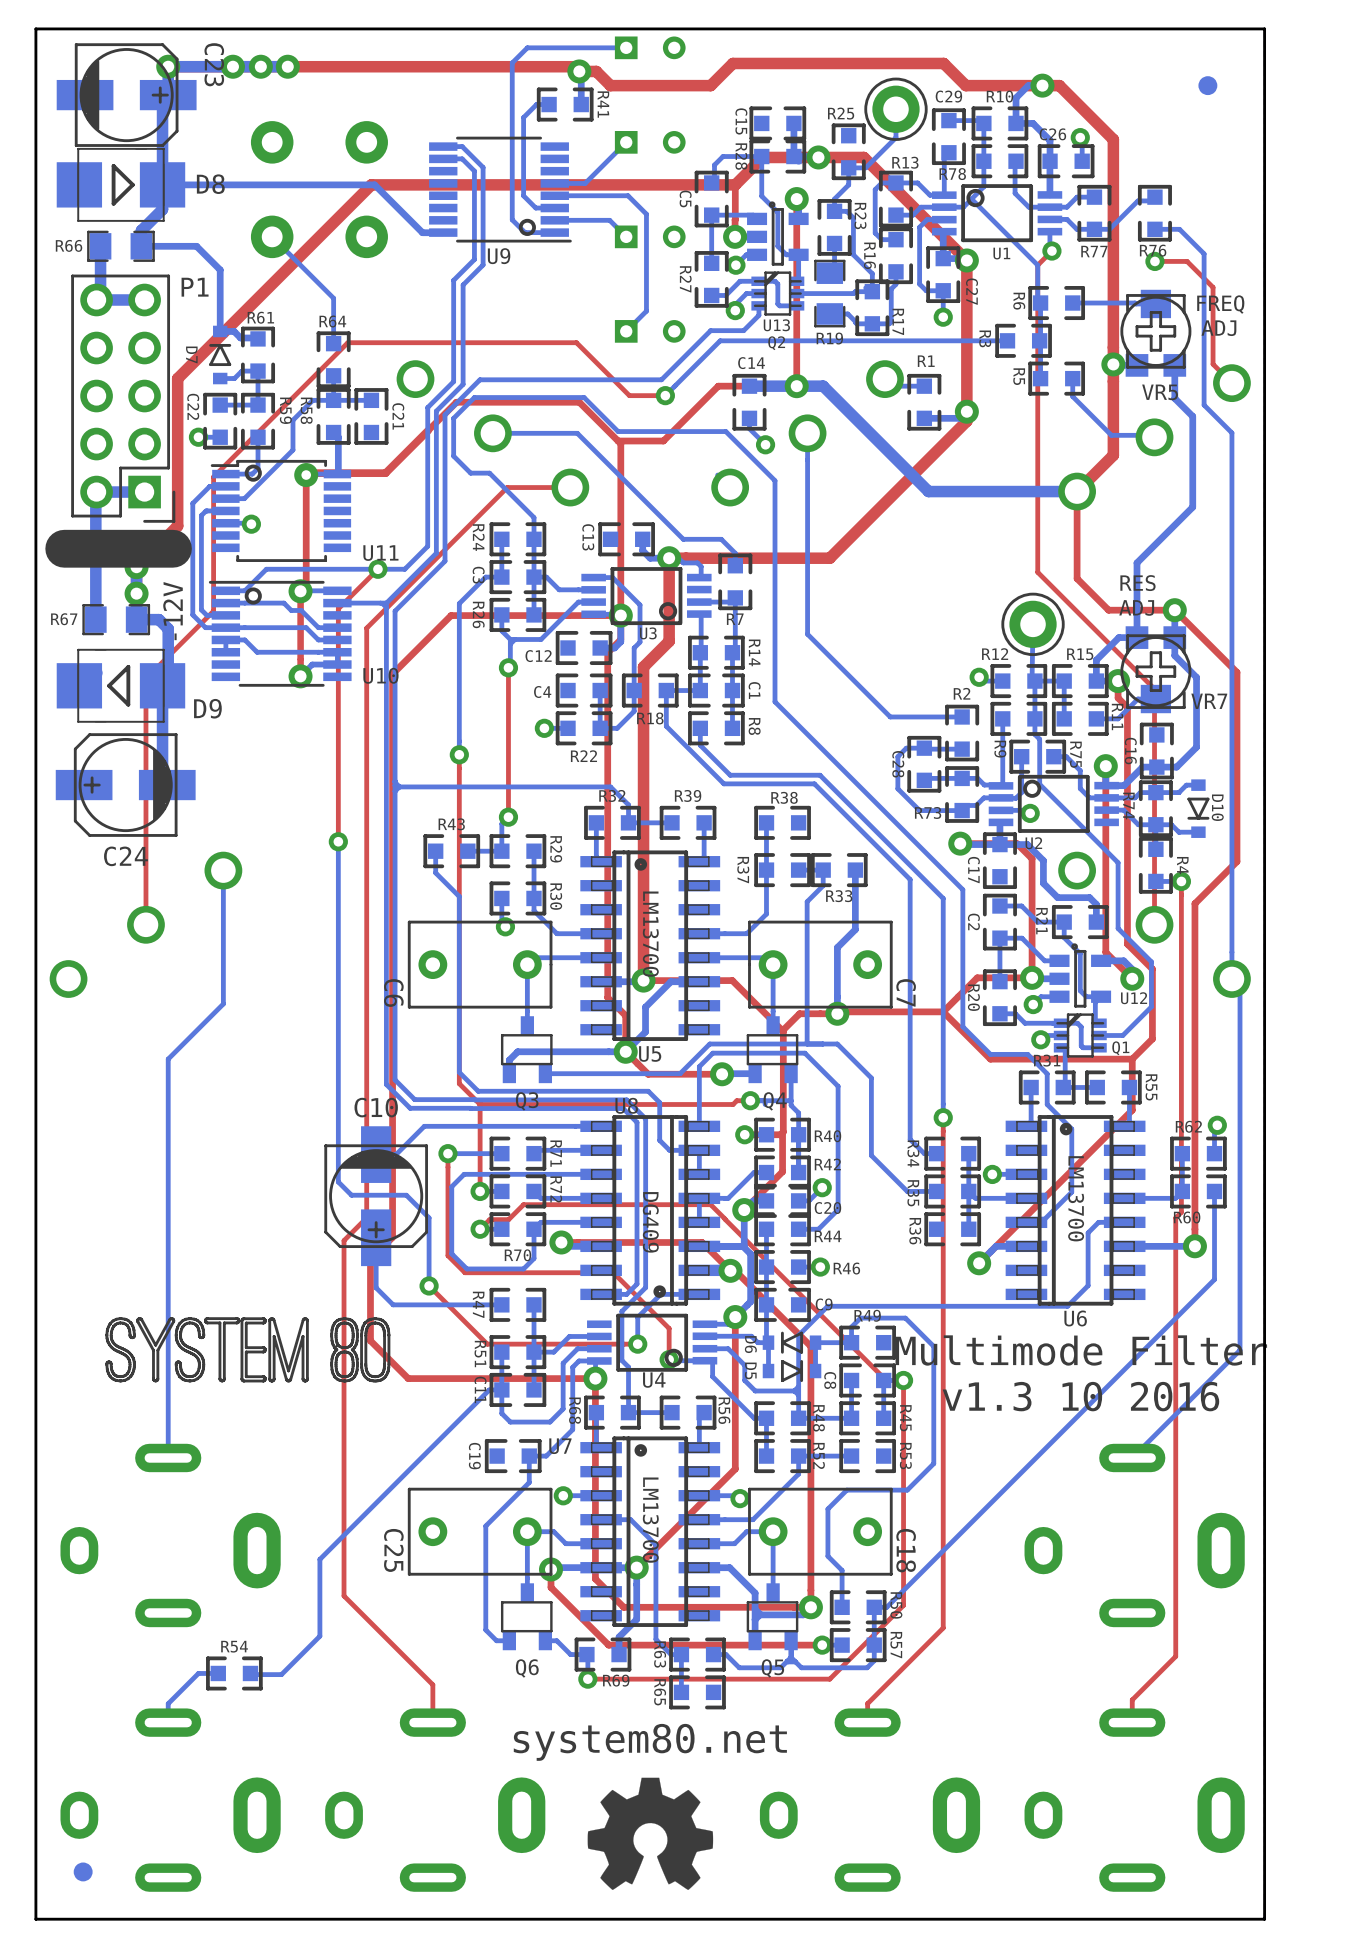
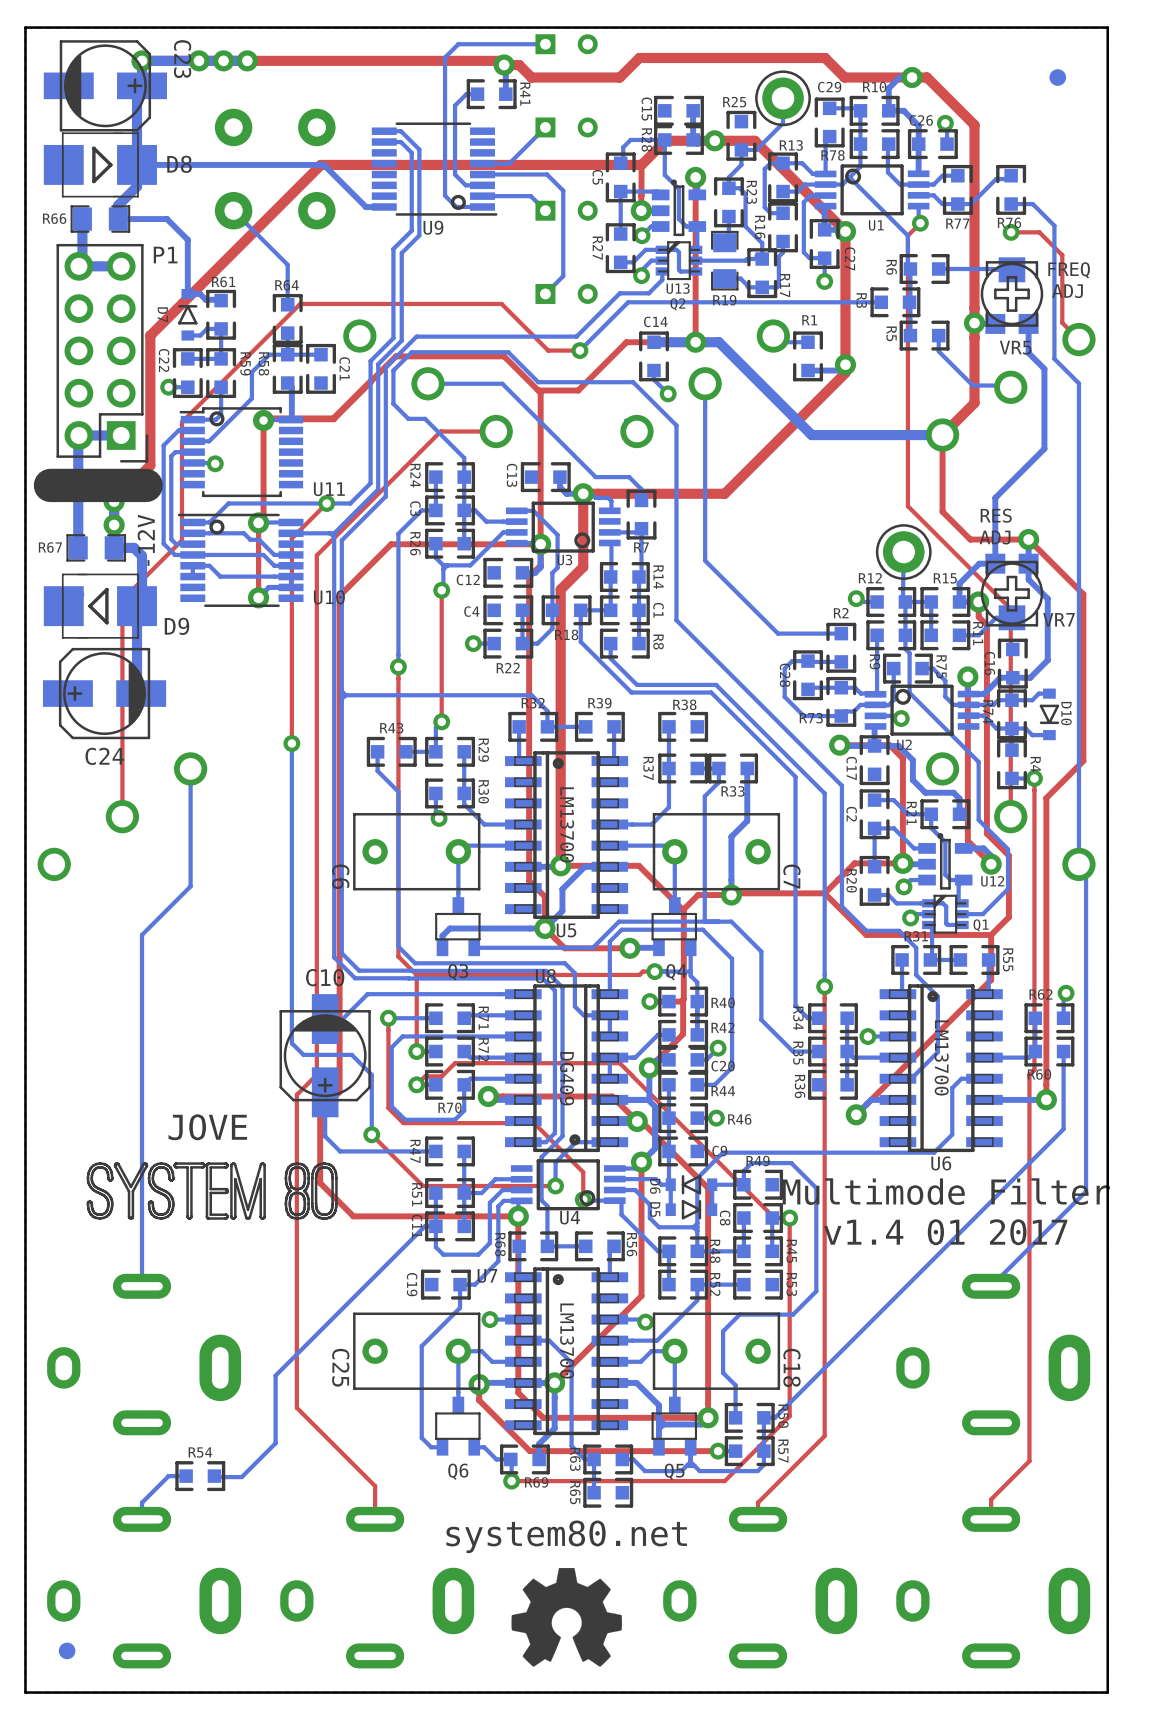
text: none -> JOVE (207, 1127)
text: v1.3 10 2016 (1080, 1396) -> v1.4 01 2017 (945, 1232)

